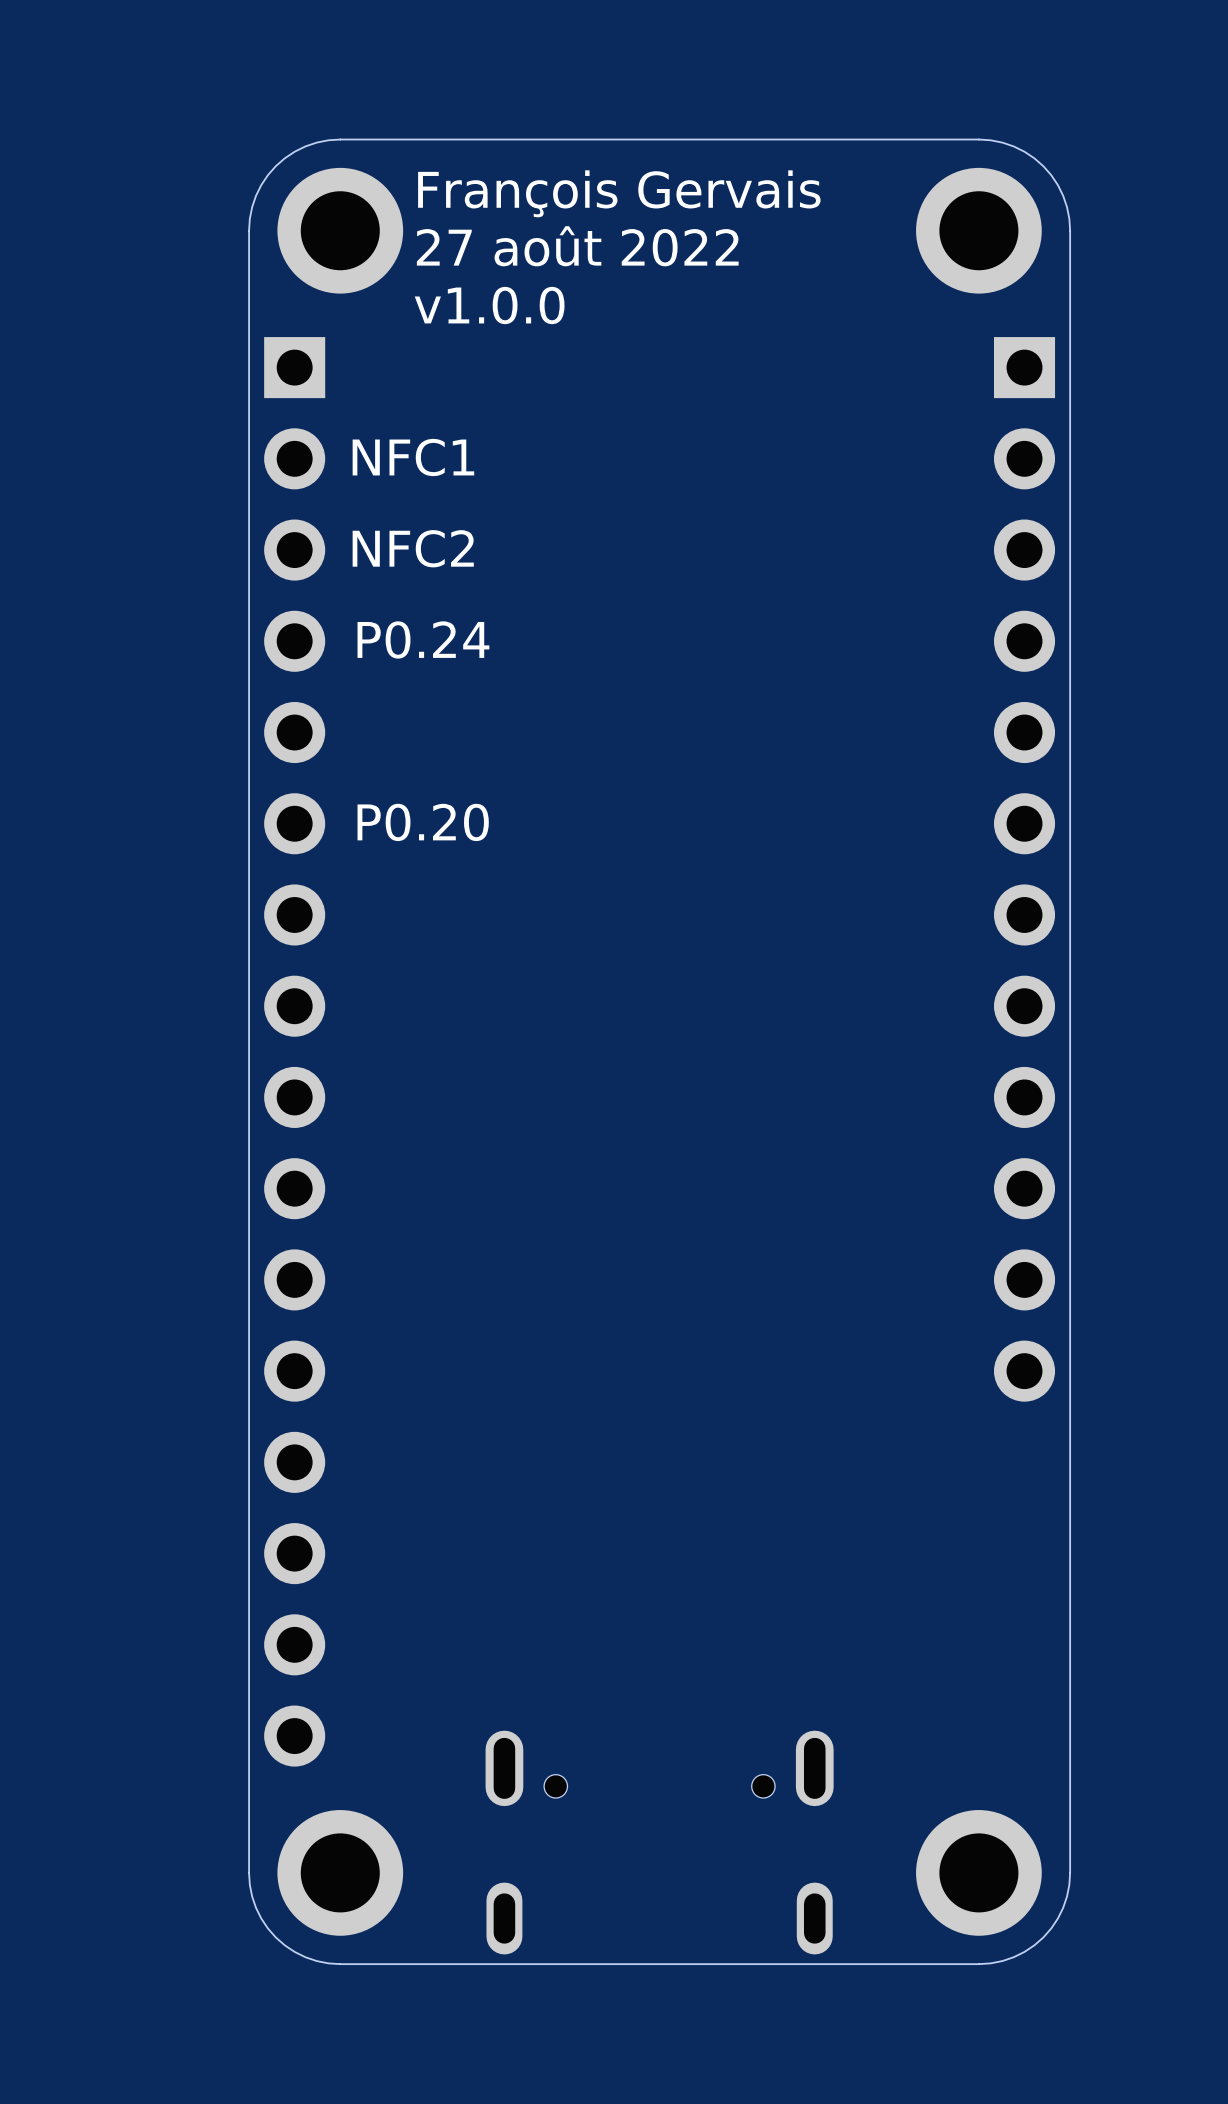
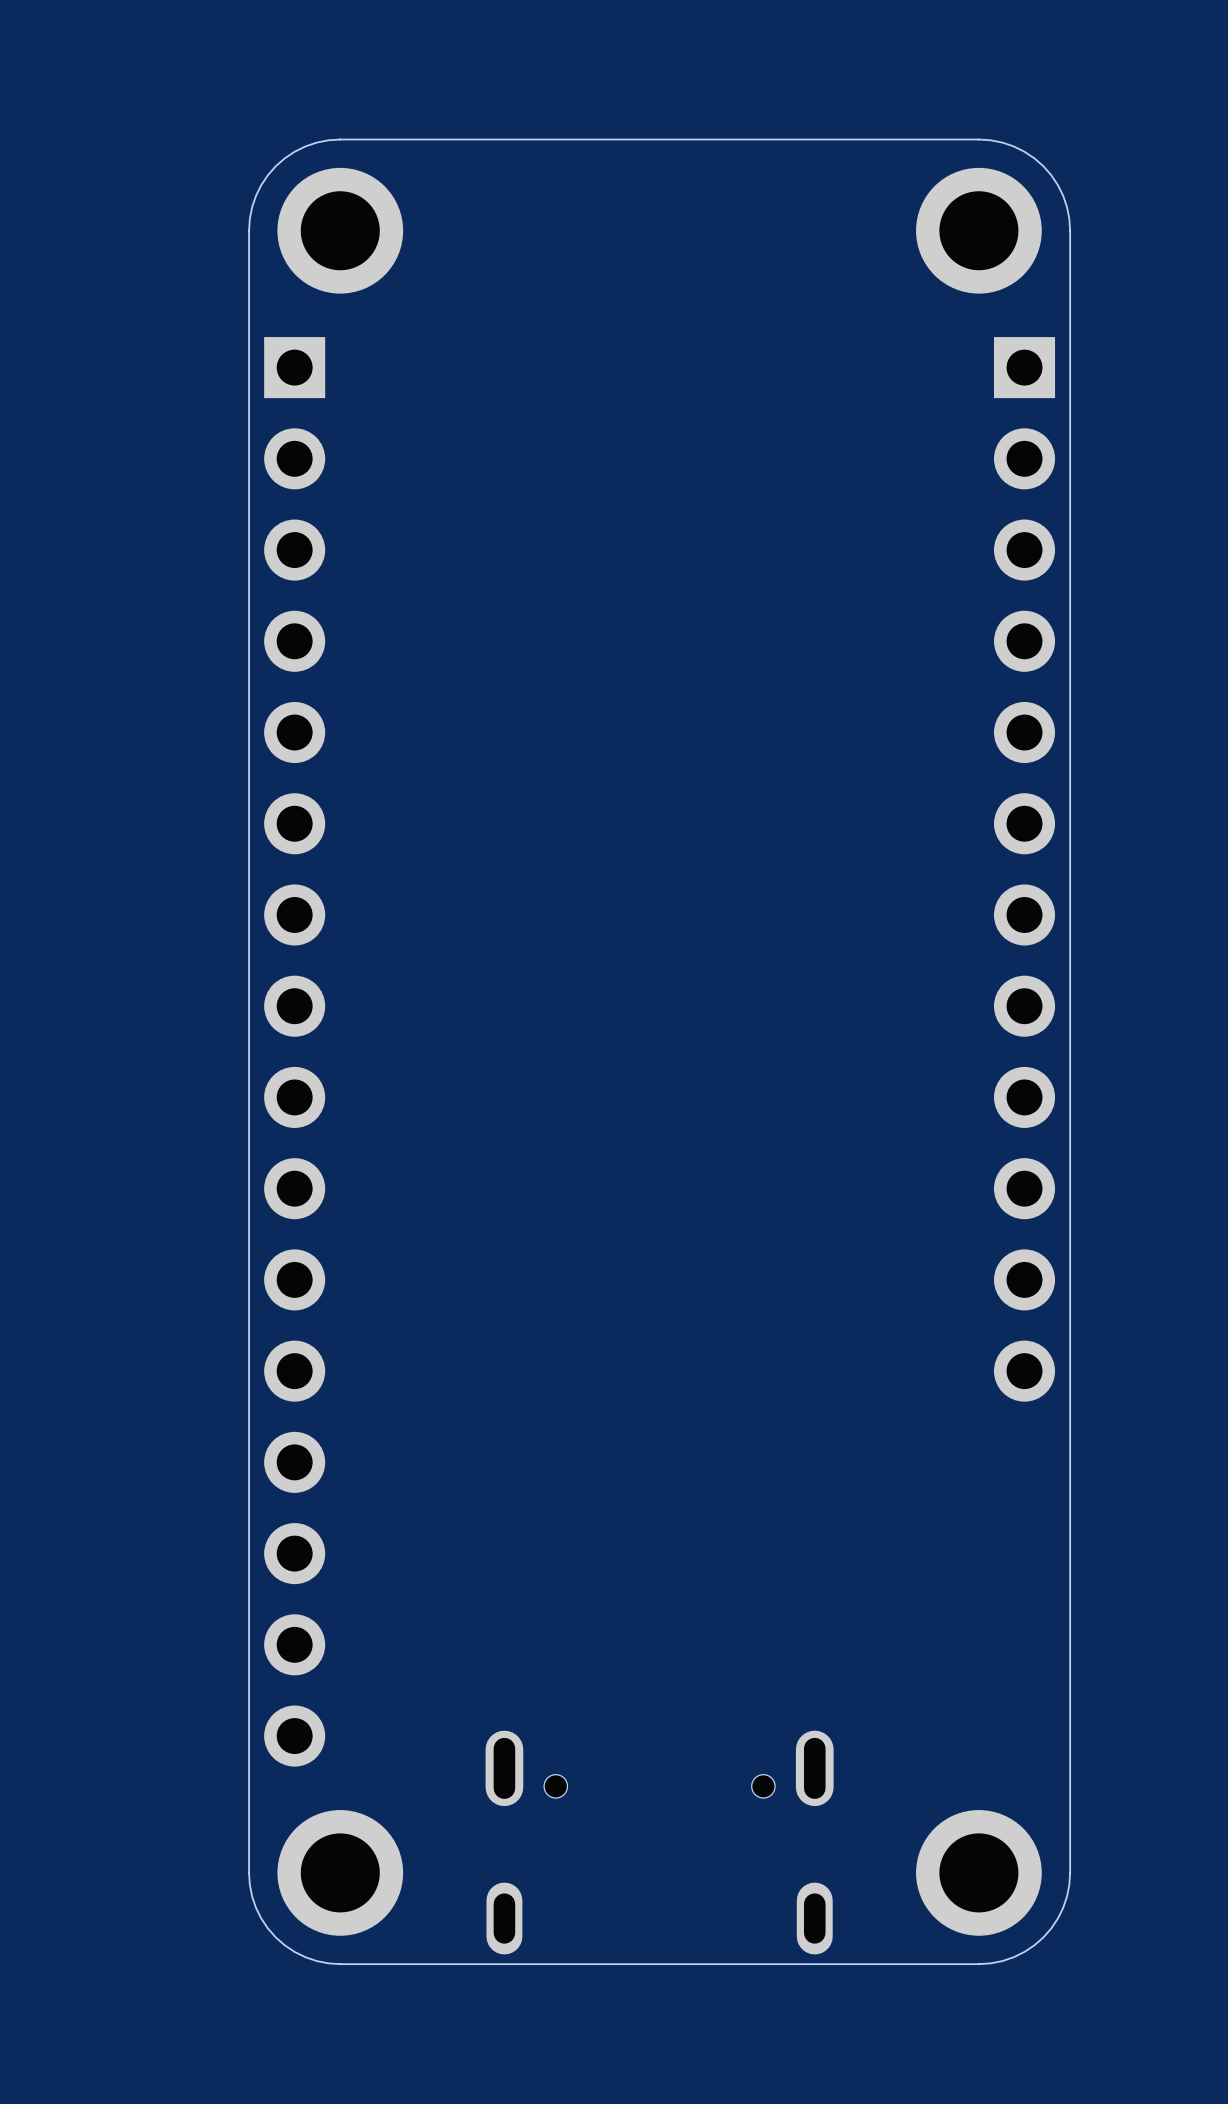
text: François Gervais (619, 193) -> none
text: 27 août 2022 (577, 246) -> none
text: v1.0.0 (489, 305) -> none
text: NFC1 (413, 457) -> none
text: NFC2 (413, 548) -> none
text: P0.24 (423, 639) -> none
text: P0.20 (423, 822) -> none

